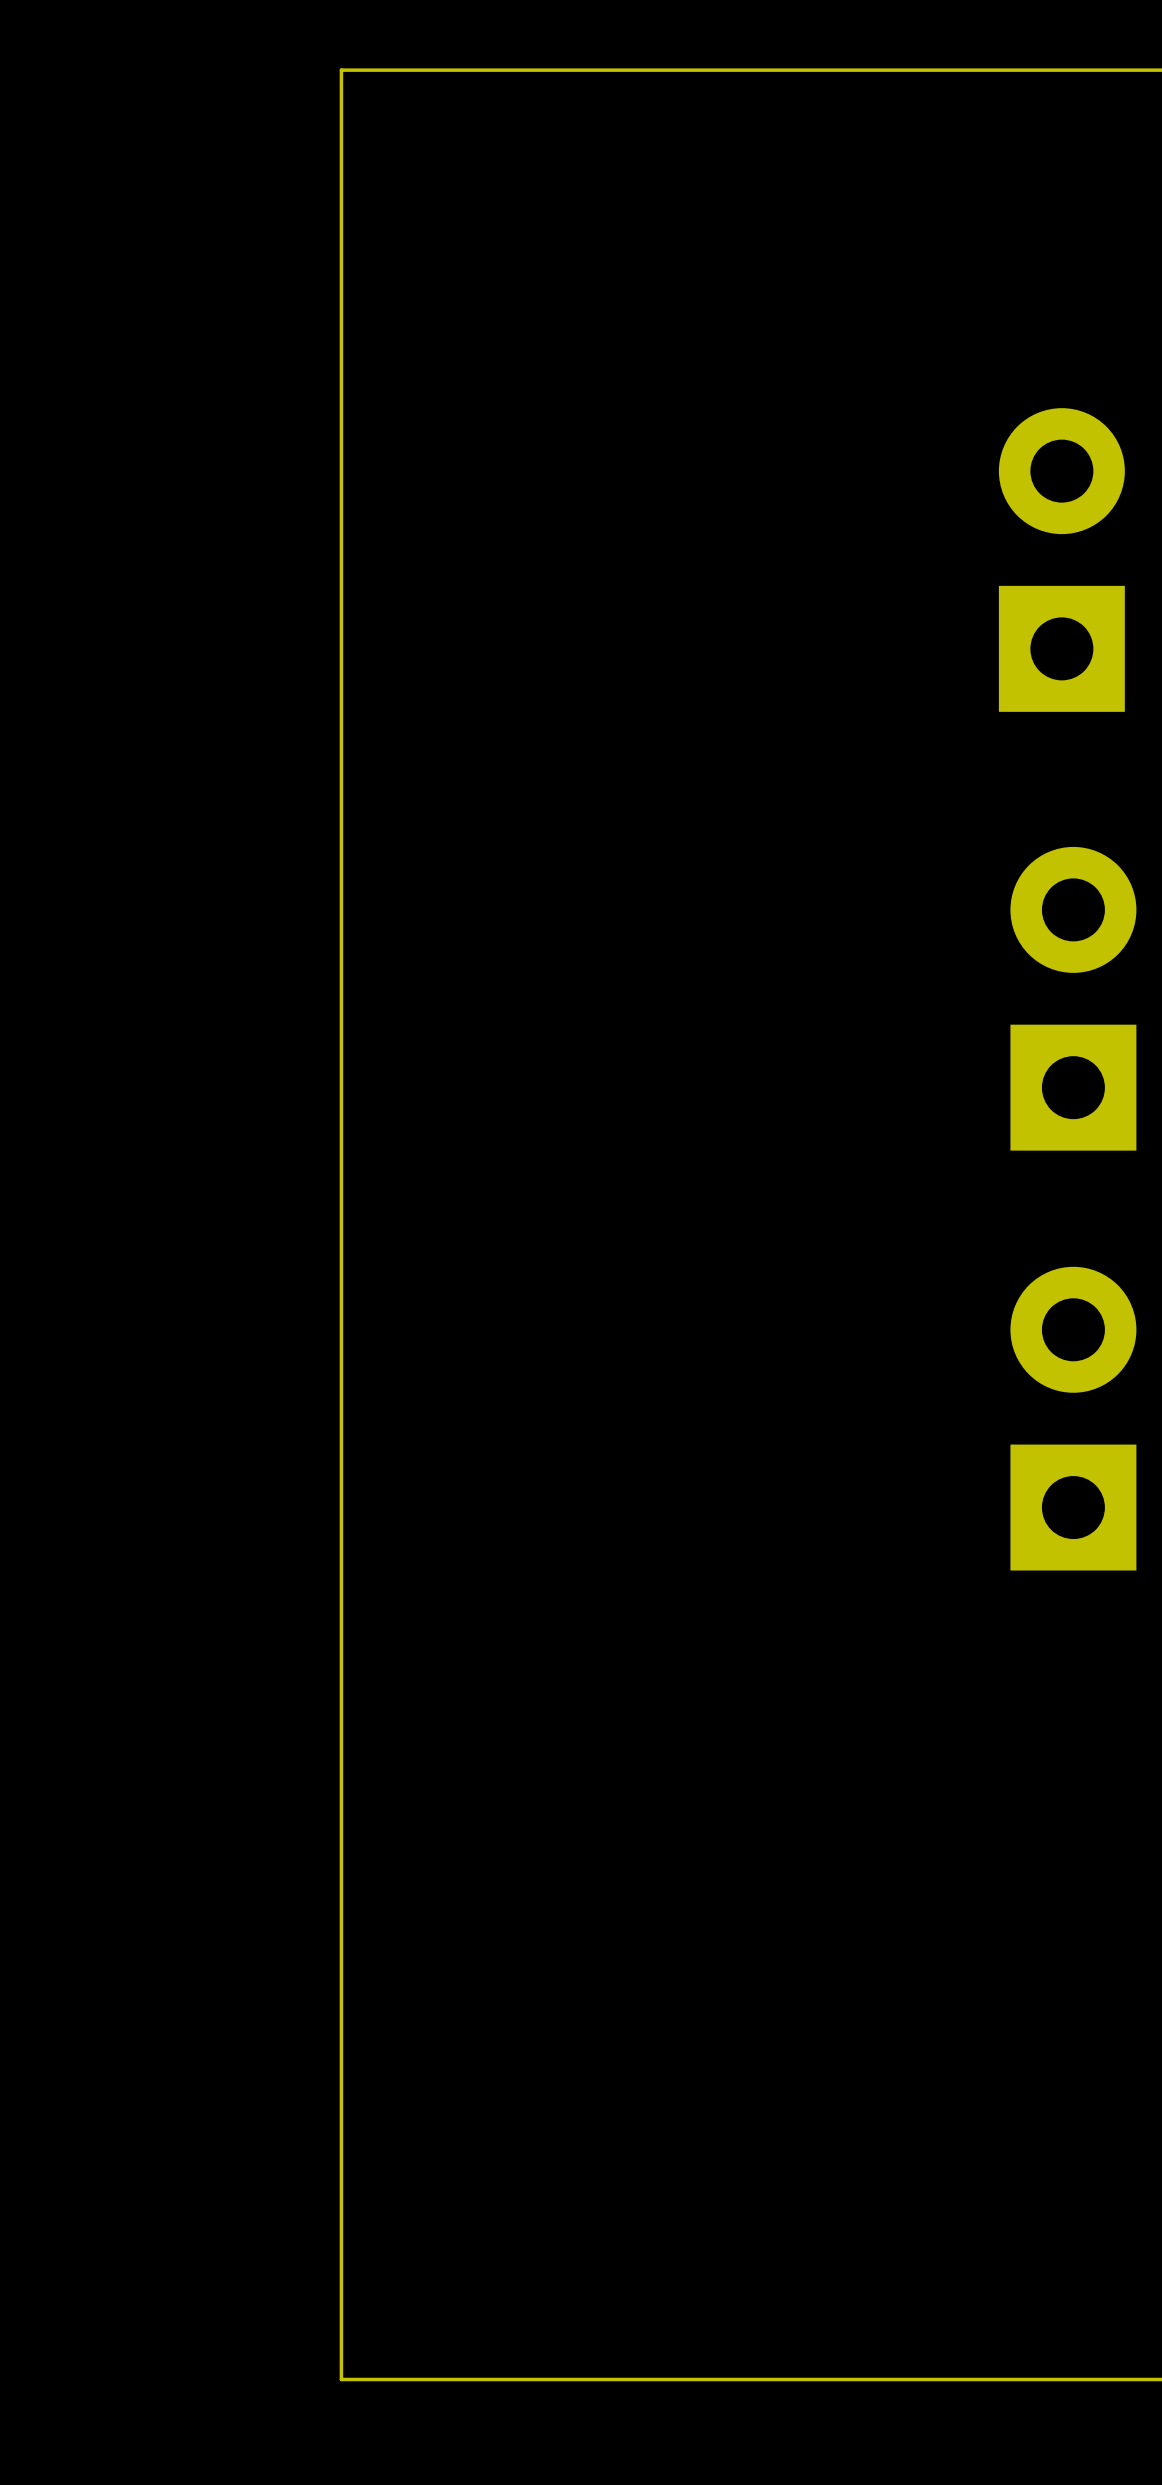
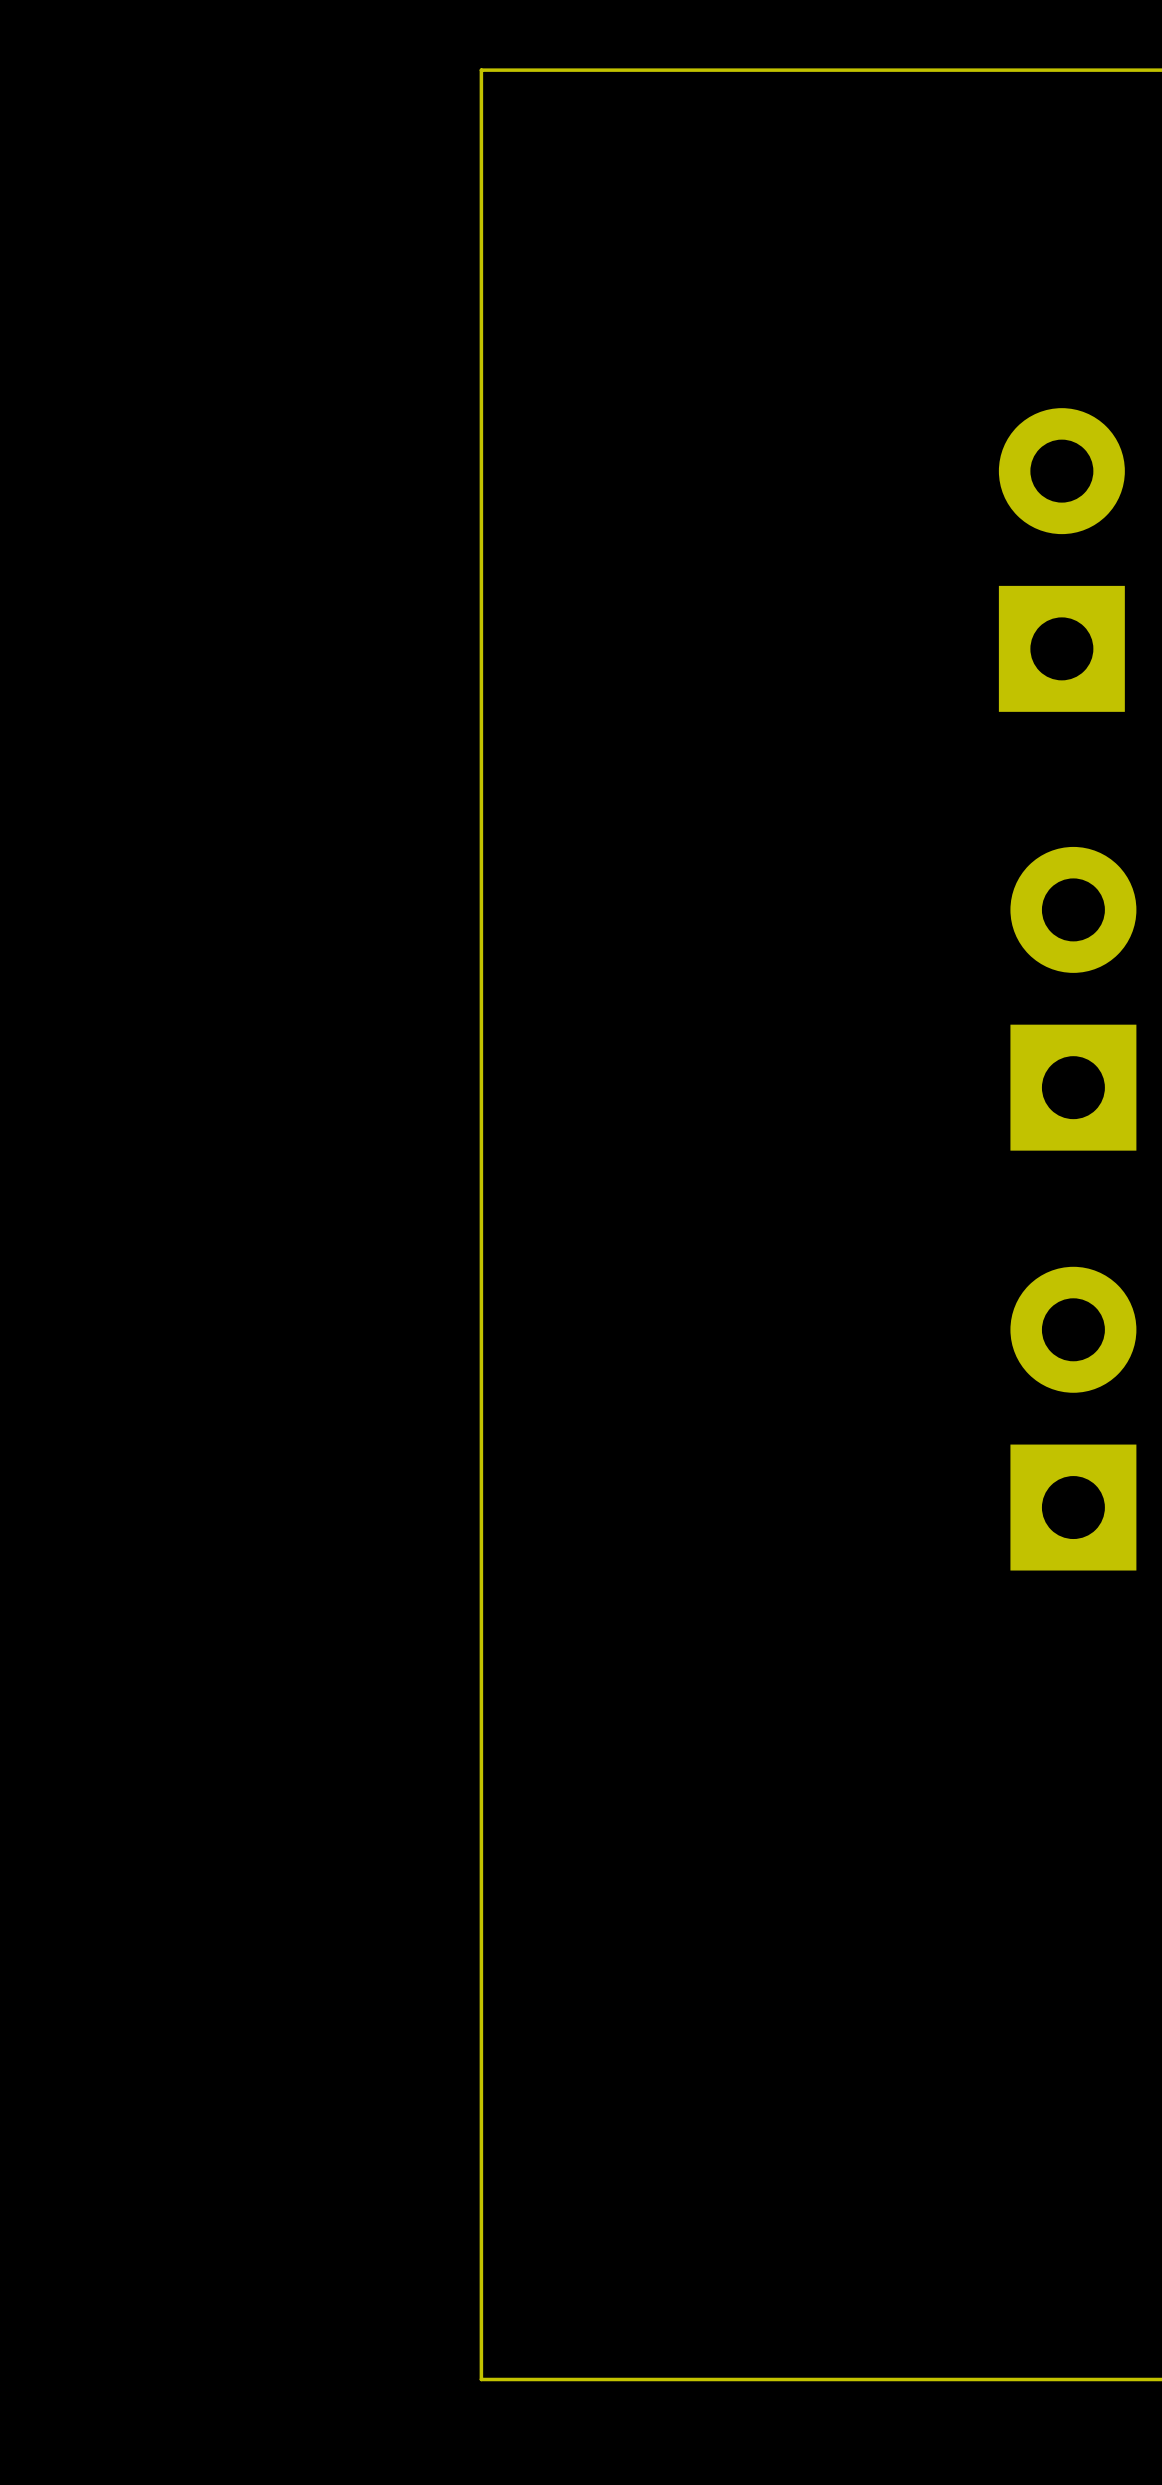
board edge: (481, 70) (341, 70) (341, 2379) (481, 2379) -> (481, 70) (481, 2379)

